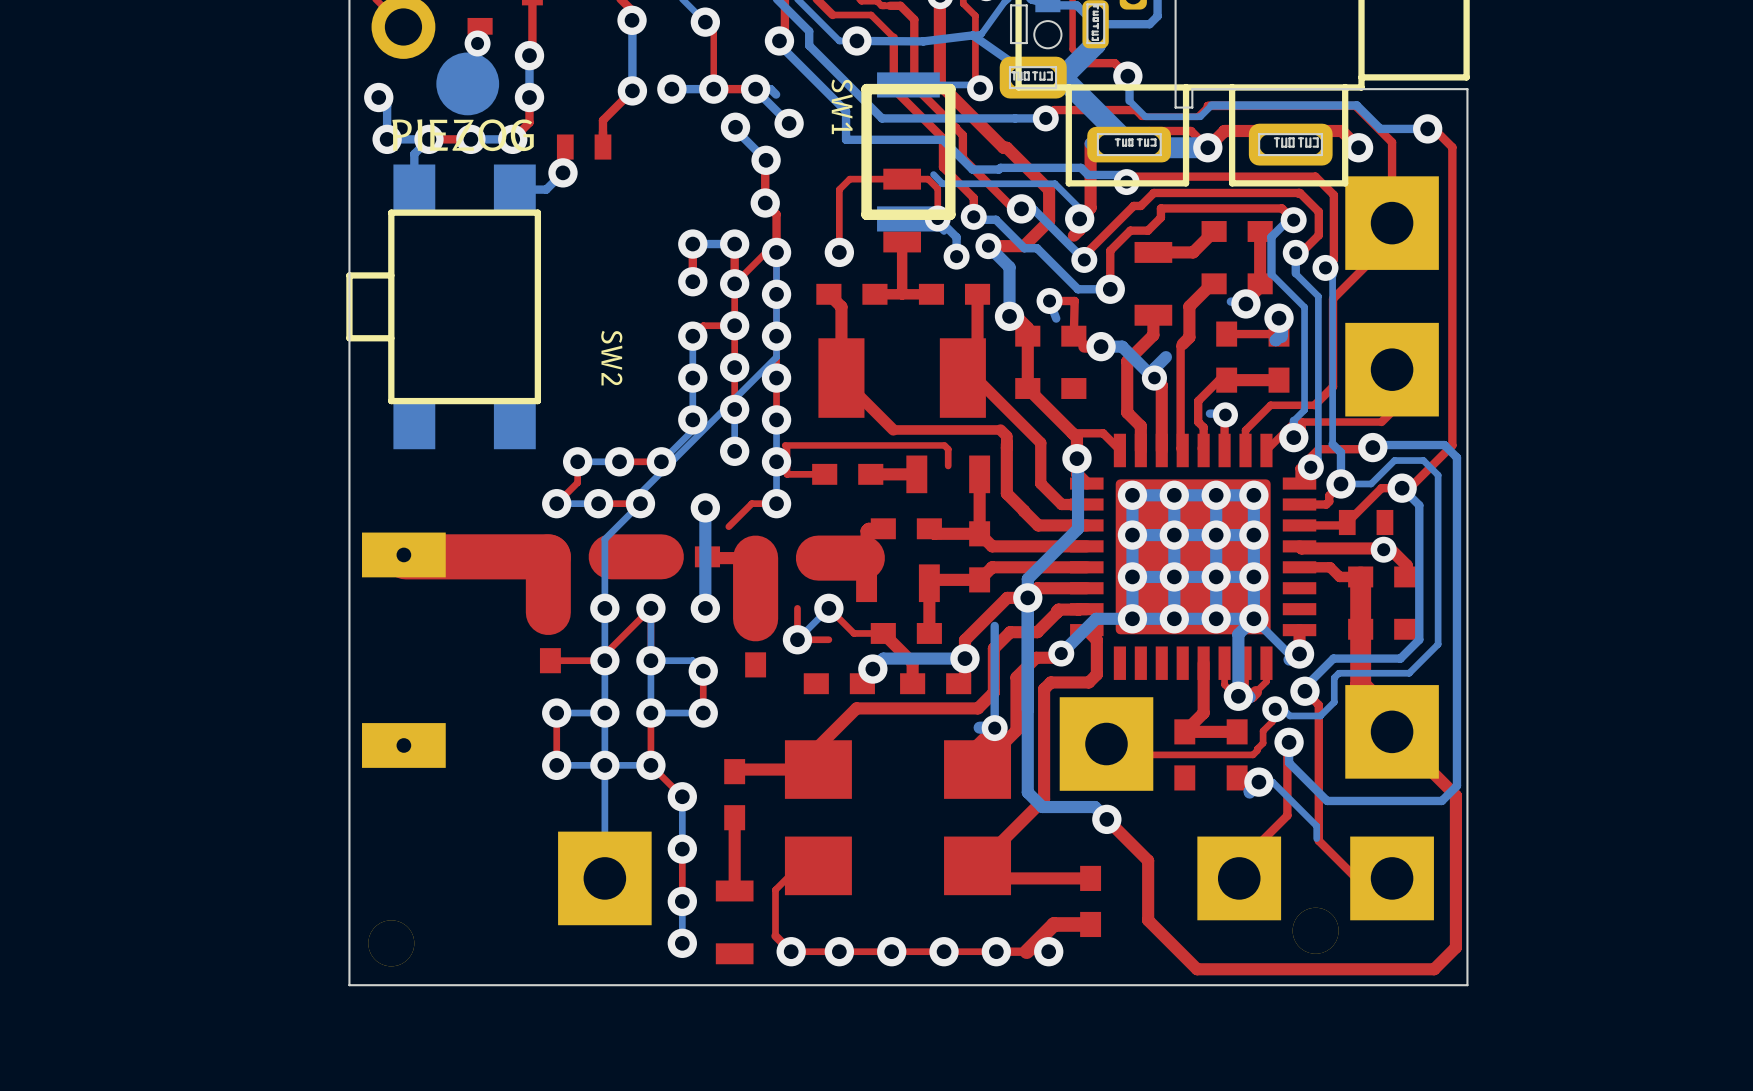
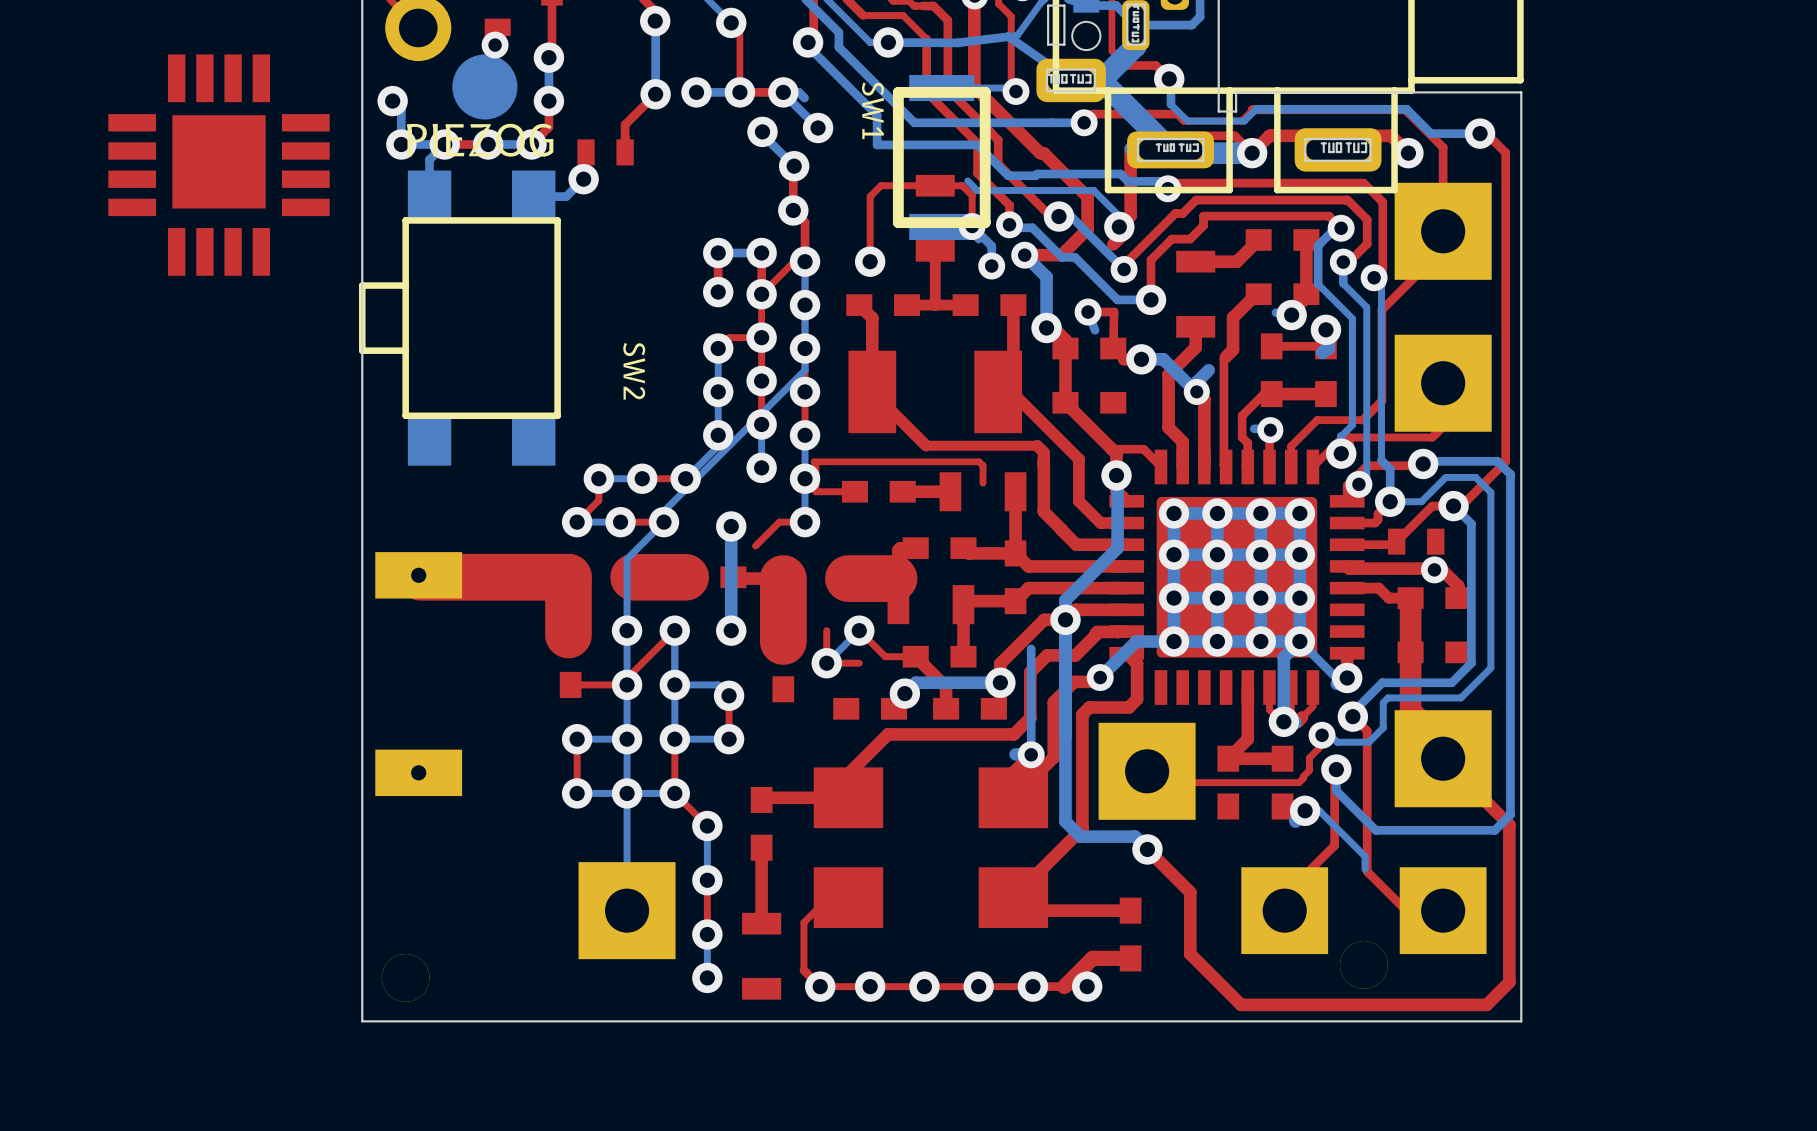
part: none -> (219, 165)

